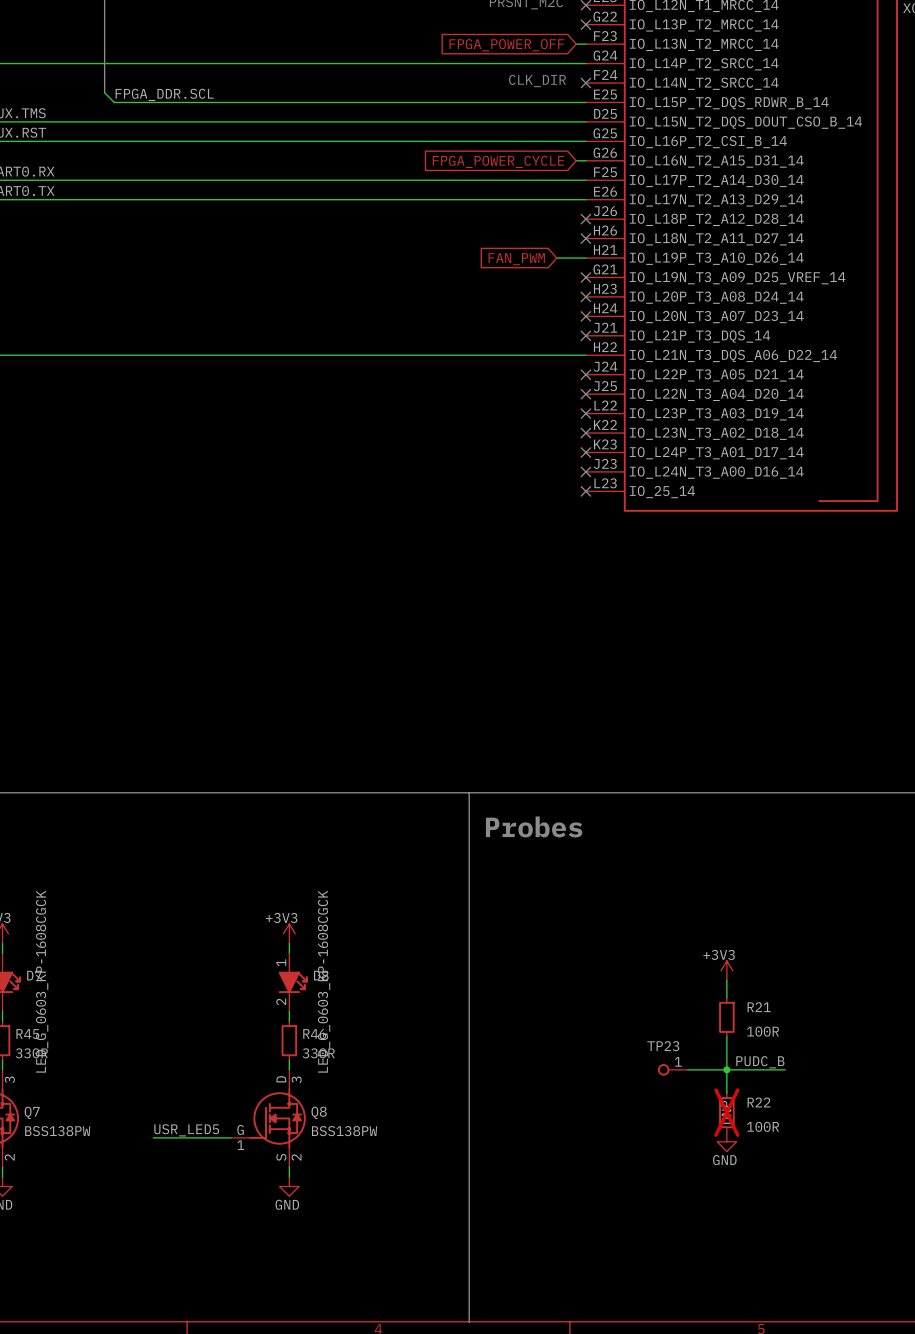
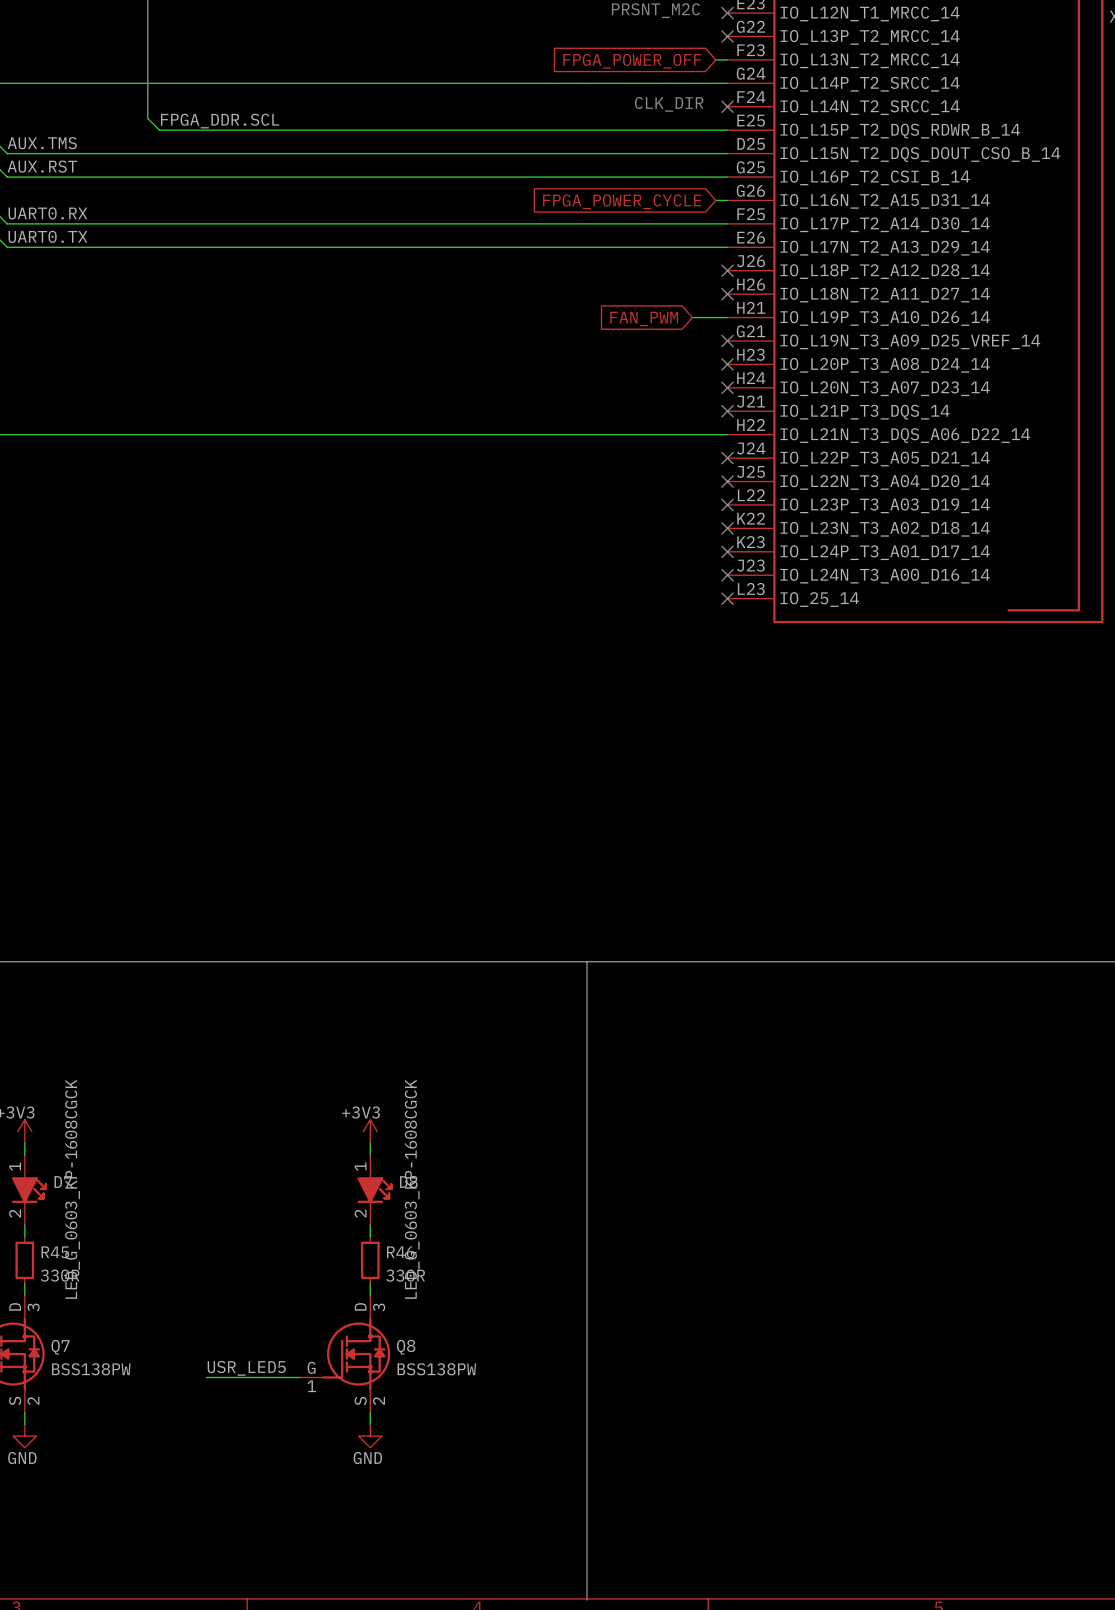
text: Probes (534, 826) -> none
power symbol: +3V3 (726, 970) -> none
wire: (726, 980) (726, 997) -> none
R21: (726, 1017) -> none
wire: (726, 1036) (726, 1093) -> none
label: PUDC_B (760, 1062) -> none
TP23: (672, 1069) -> none
wire: (687, 1069) (785, 1069) -> none
junction: (726, 1069) -> none
R22: (726, 1112) -> none
power symbol: GND (726, 1141) -> none

